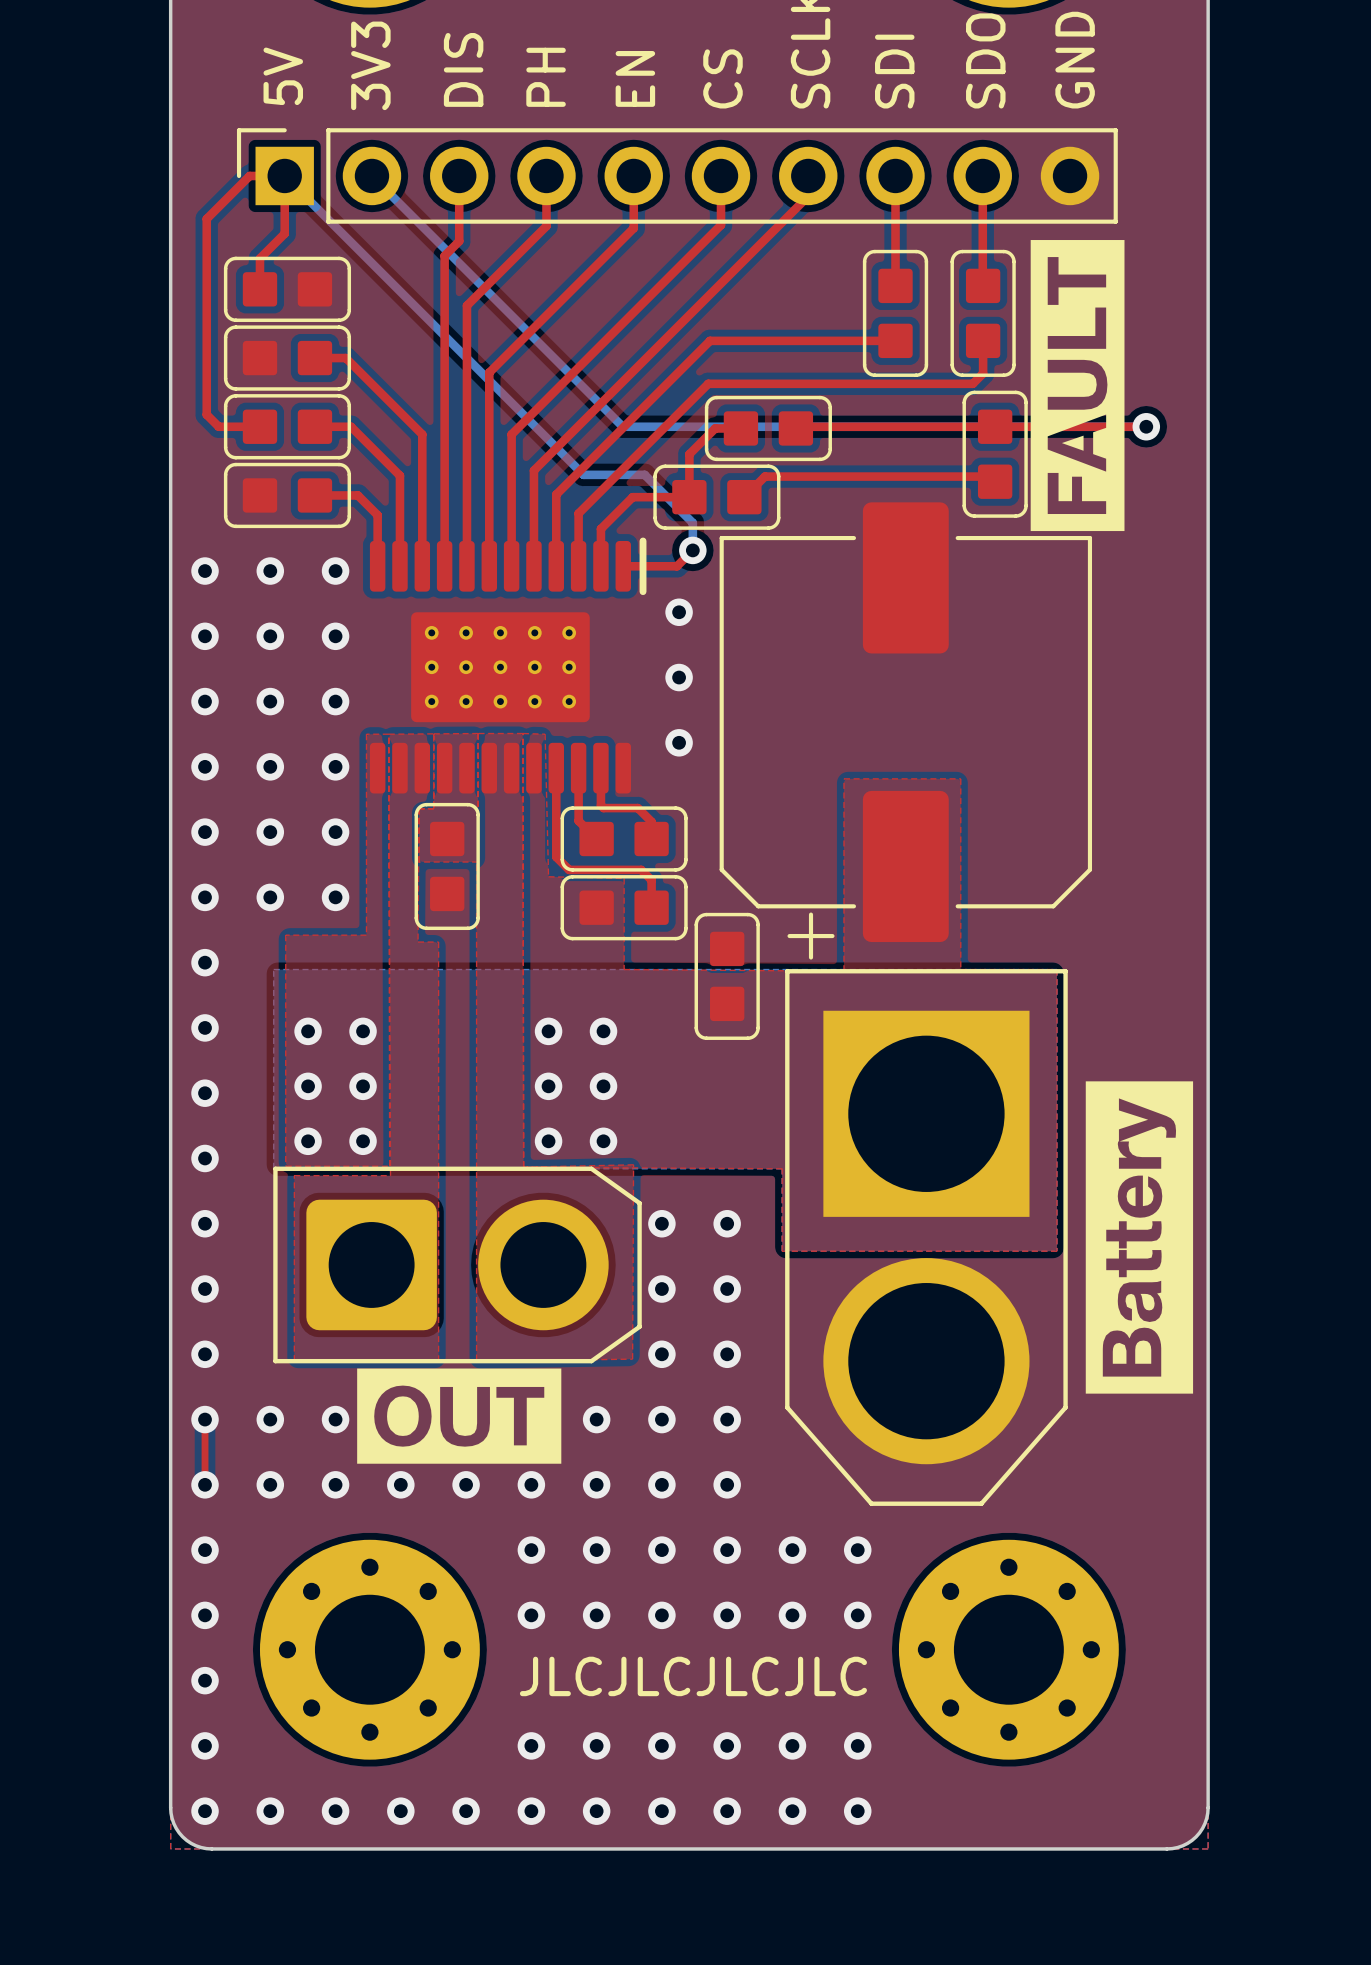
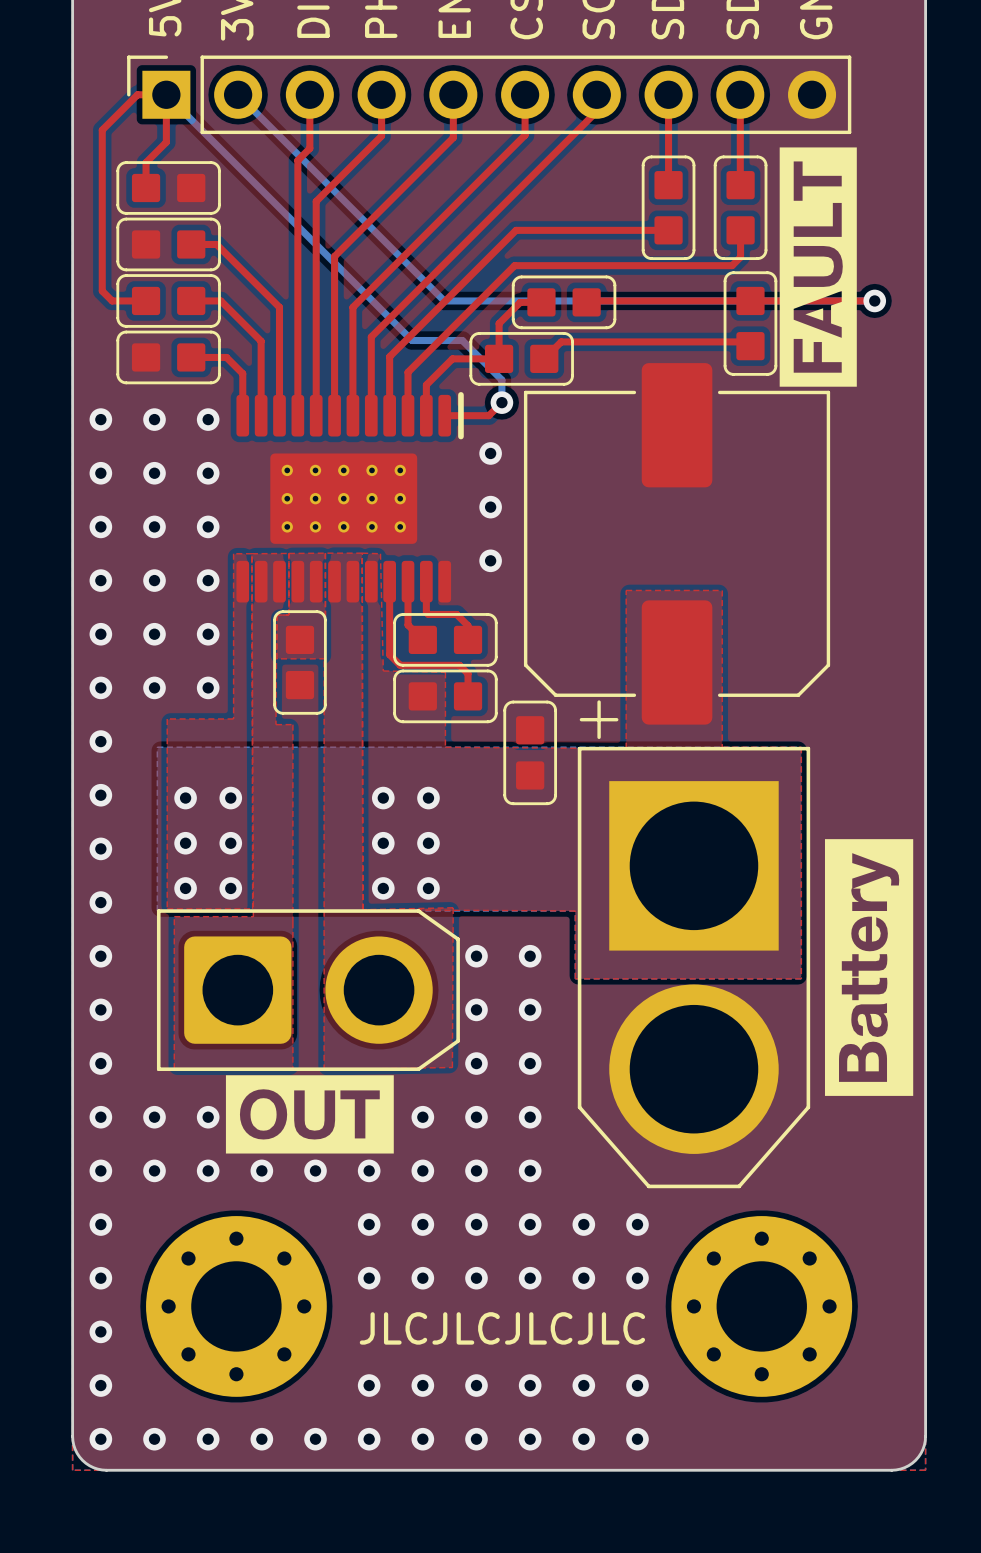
top track: (205, 1419) (205, 1484) -> none

